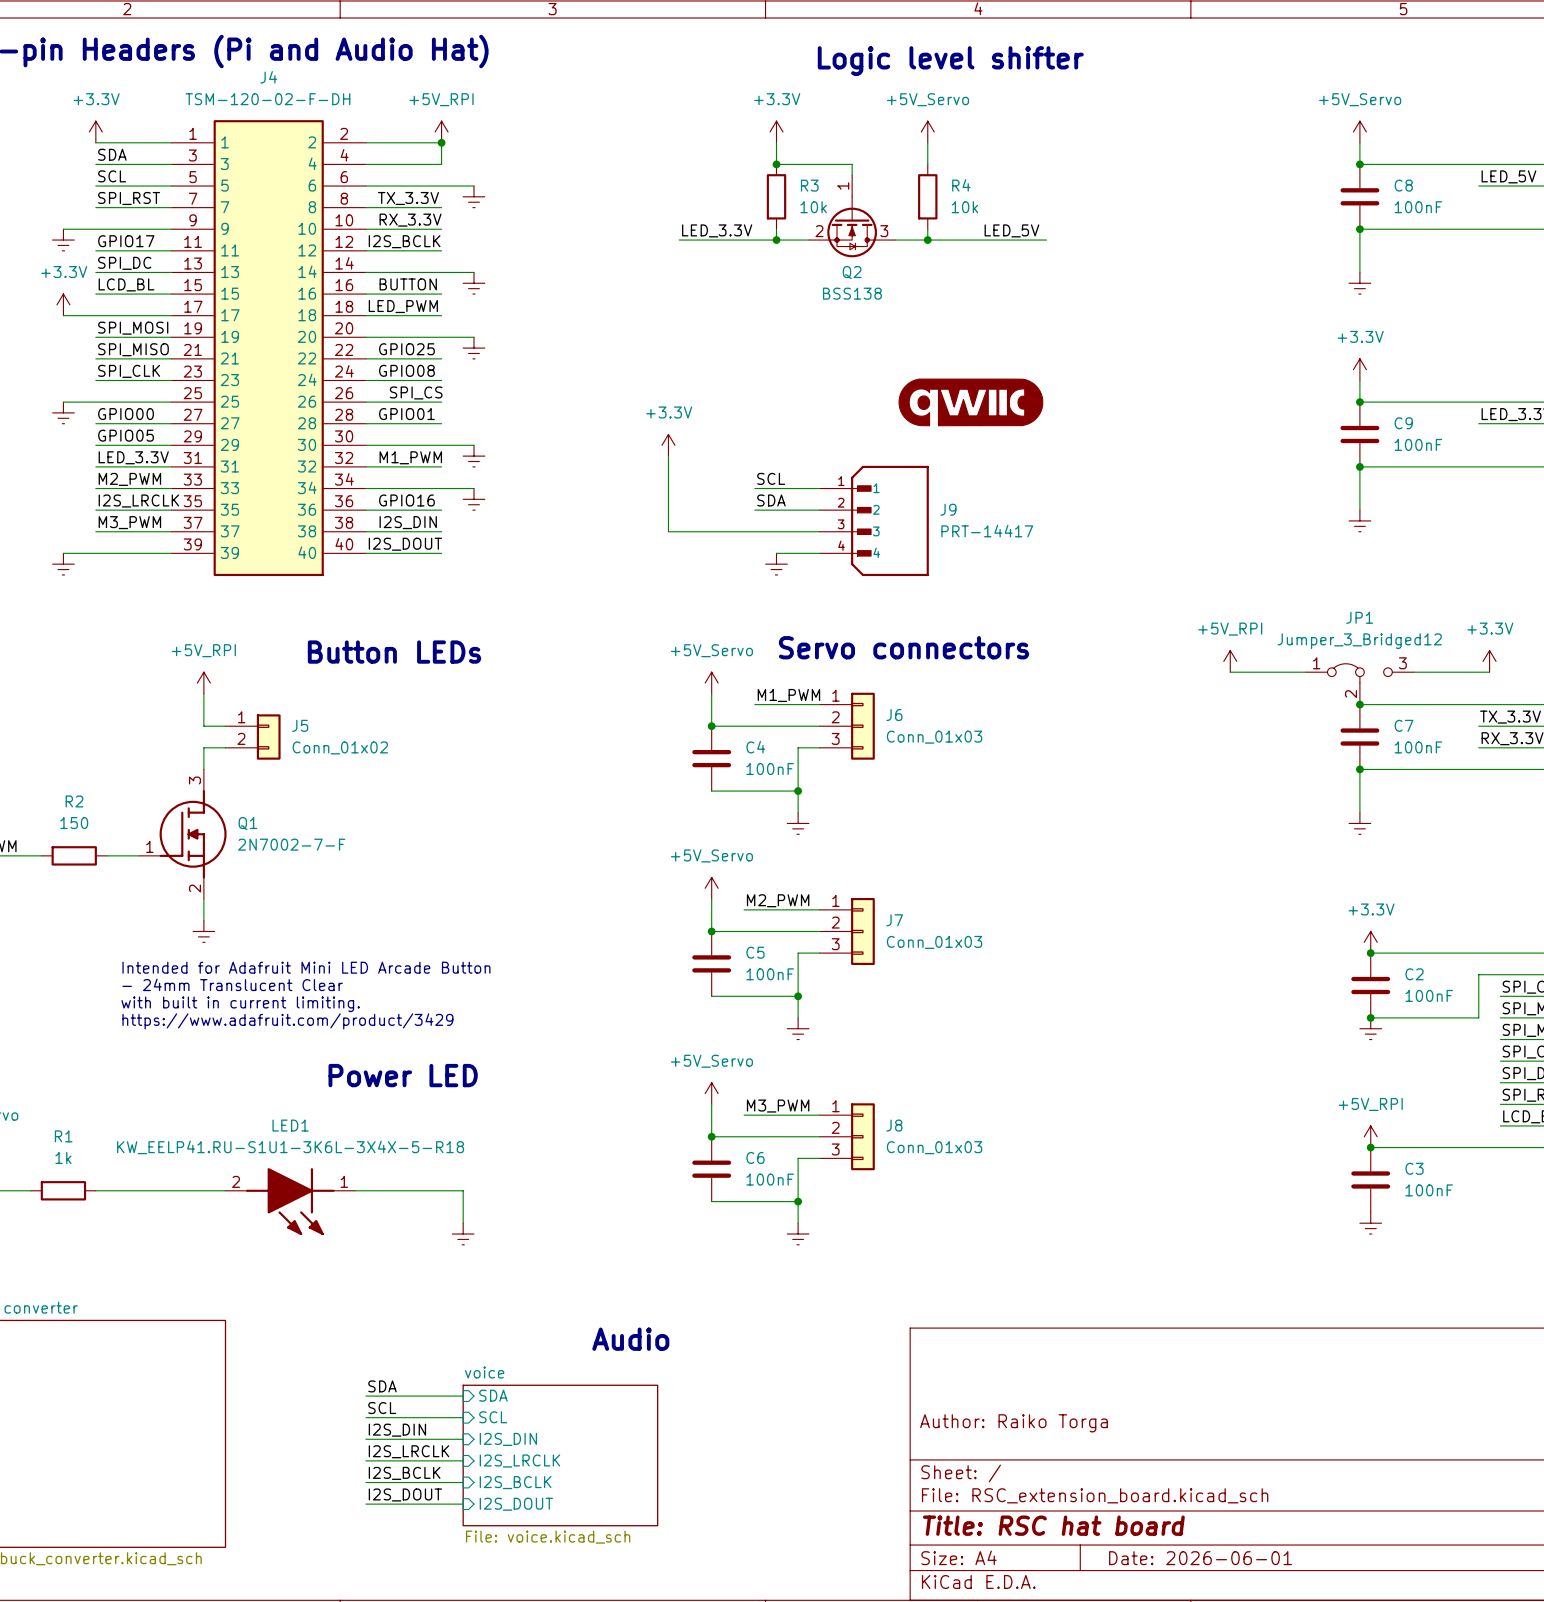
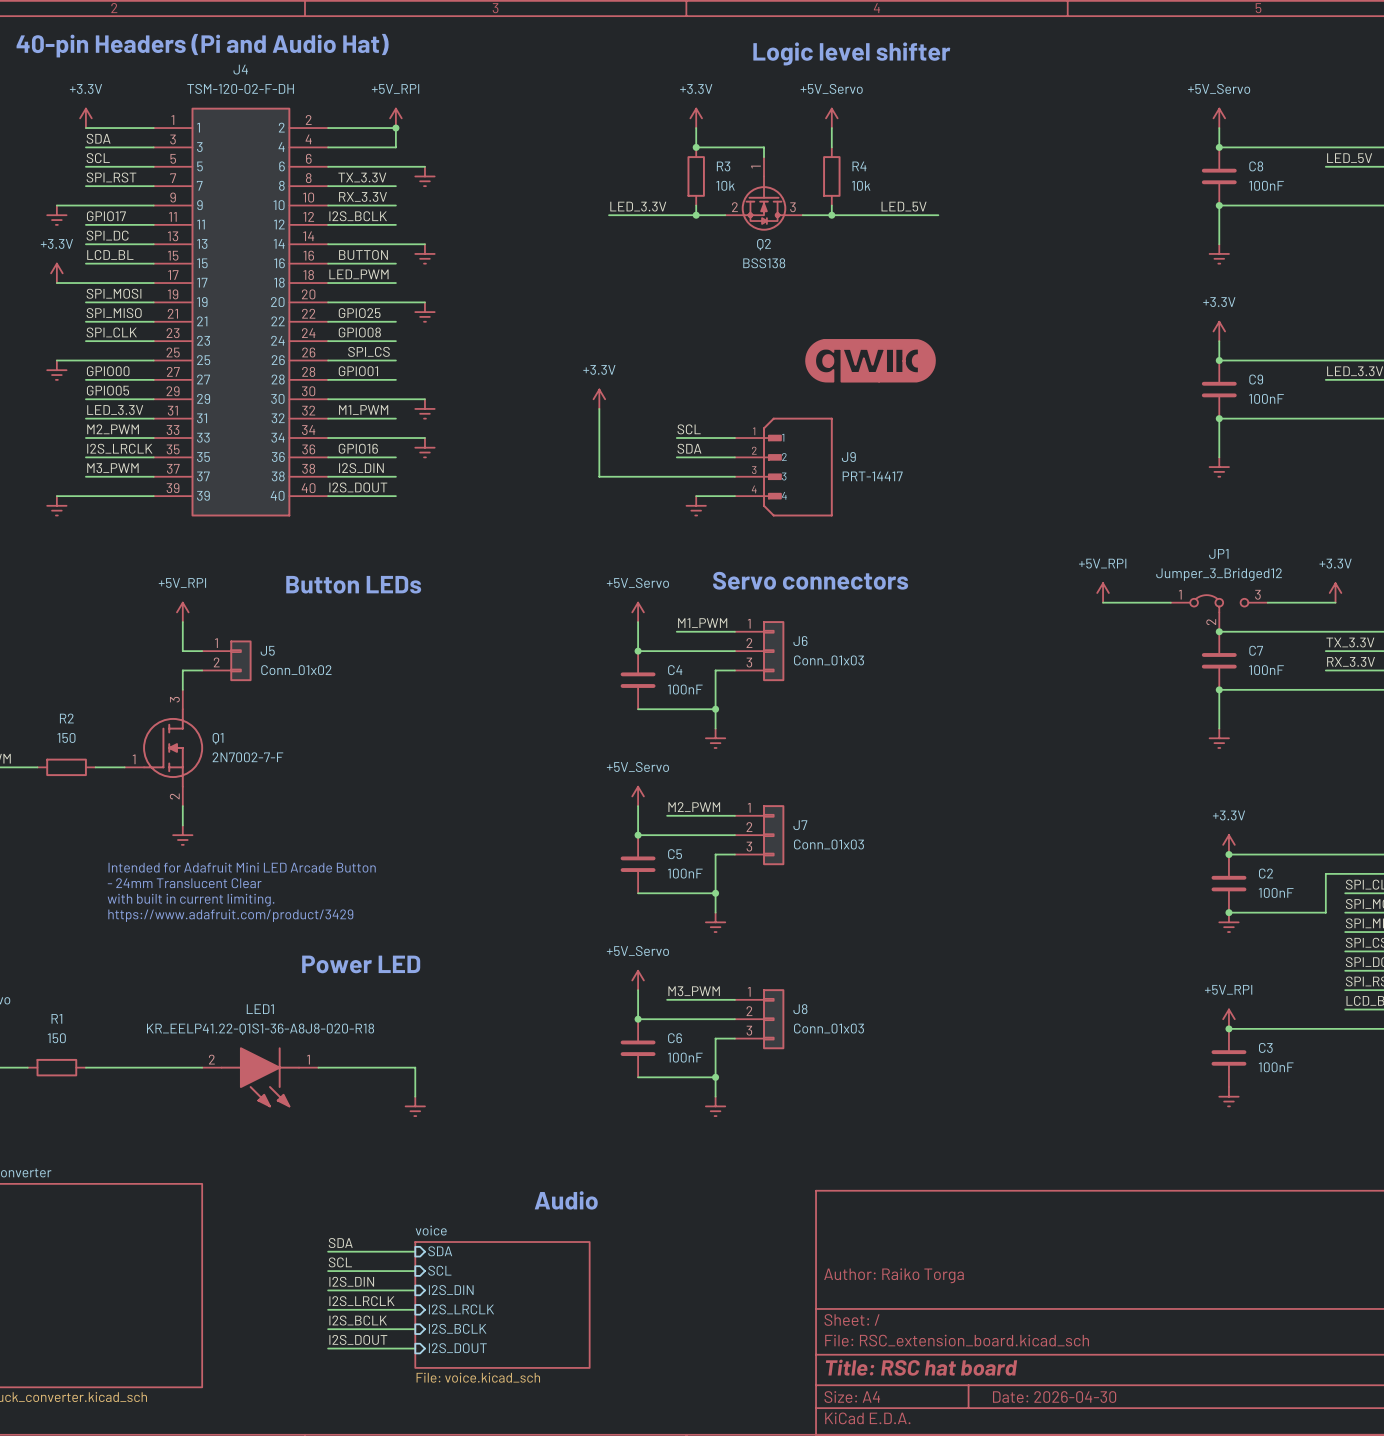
LED1 value: KW_EELP41.RU-S1U1-3K6L-3X4X-5-R18 (290, 1147) -> KR_EELP41.22-Q1S1-36-A8J8-020-R18 (260, 1029)
R1 value: 1k (63, 1157) -> 150 (56, 1038)
title block: Date: 2026-06-01 (1200, 1558) -> Date: 2026-04-30 (1054, 1397)

